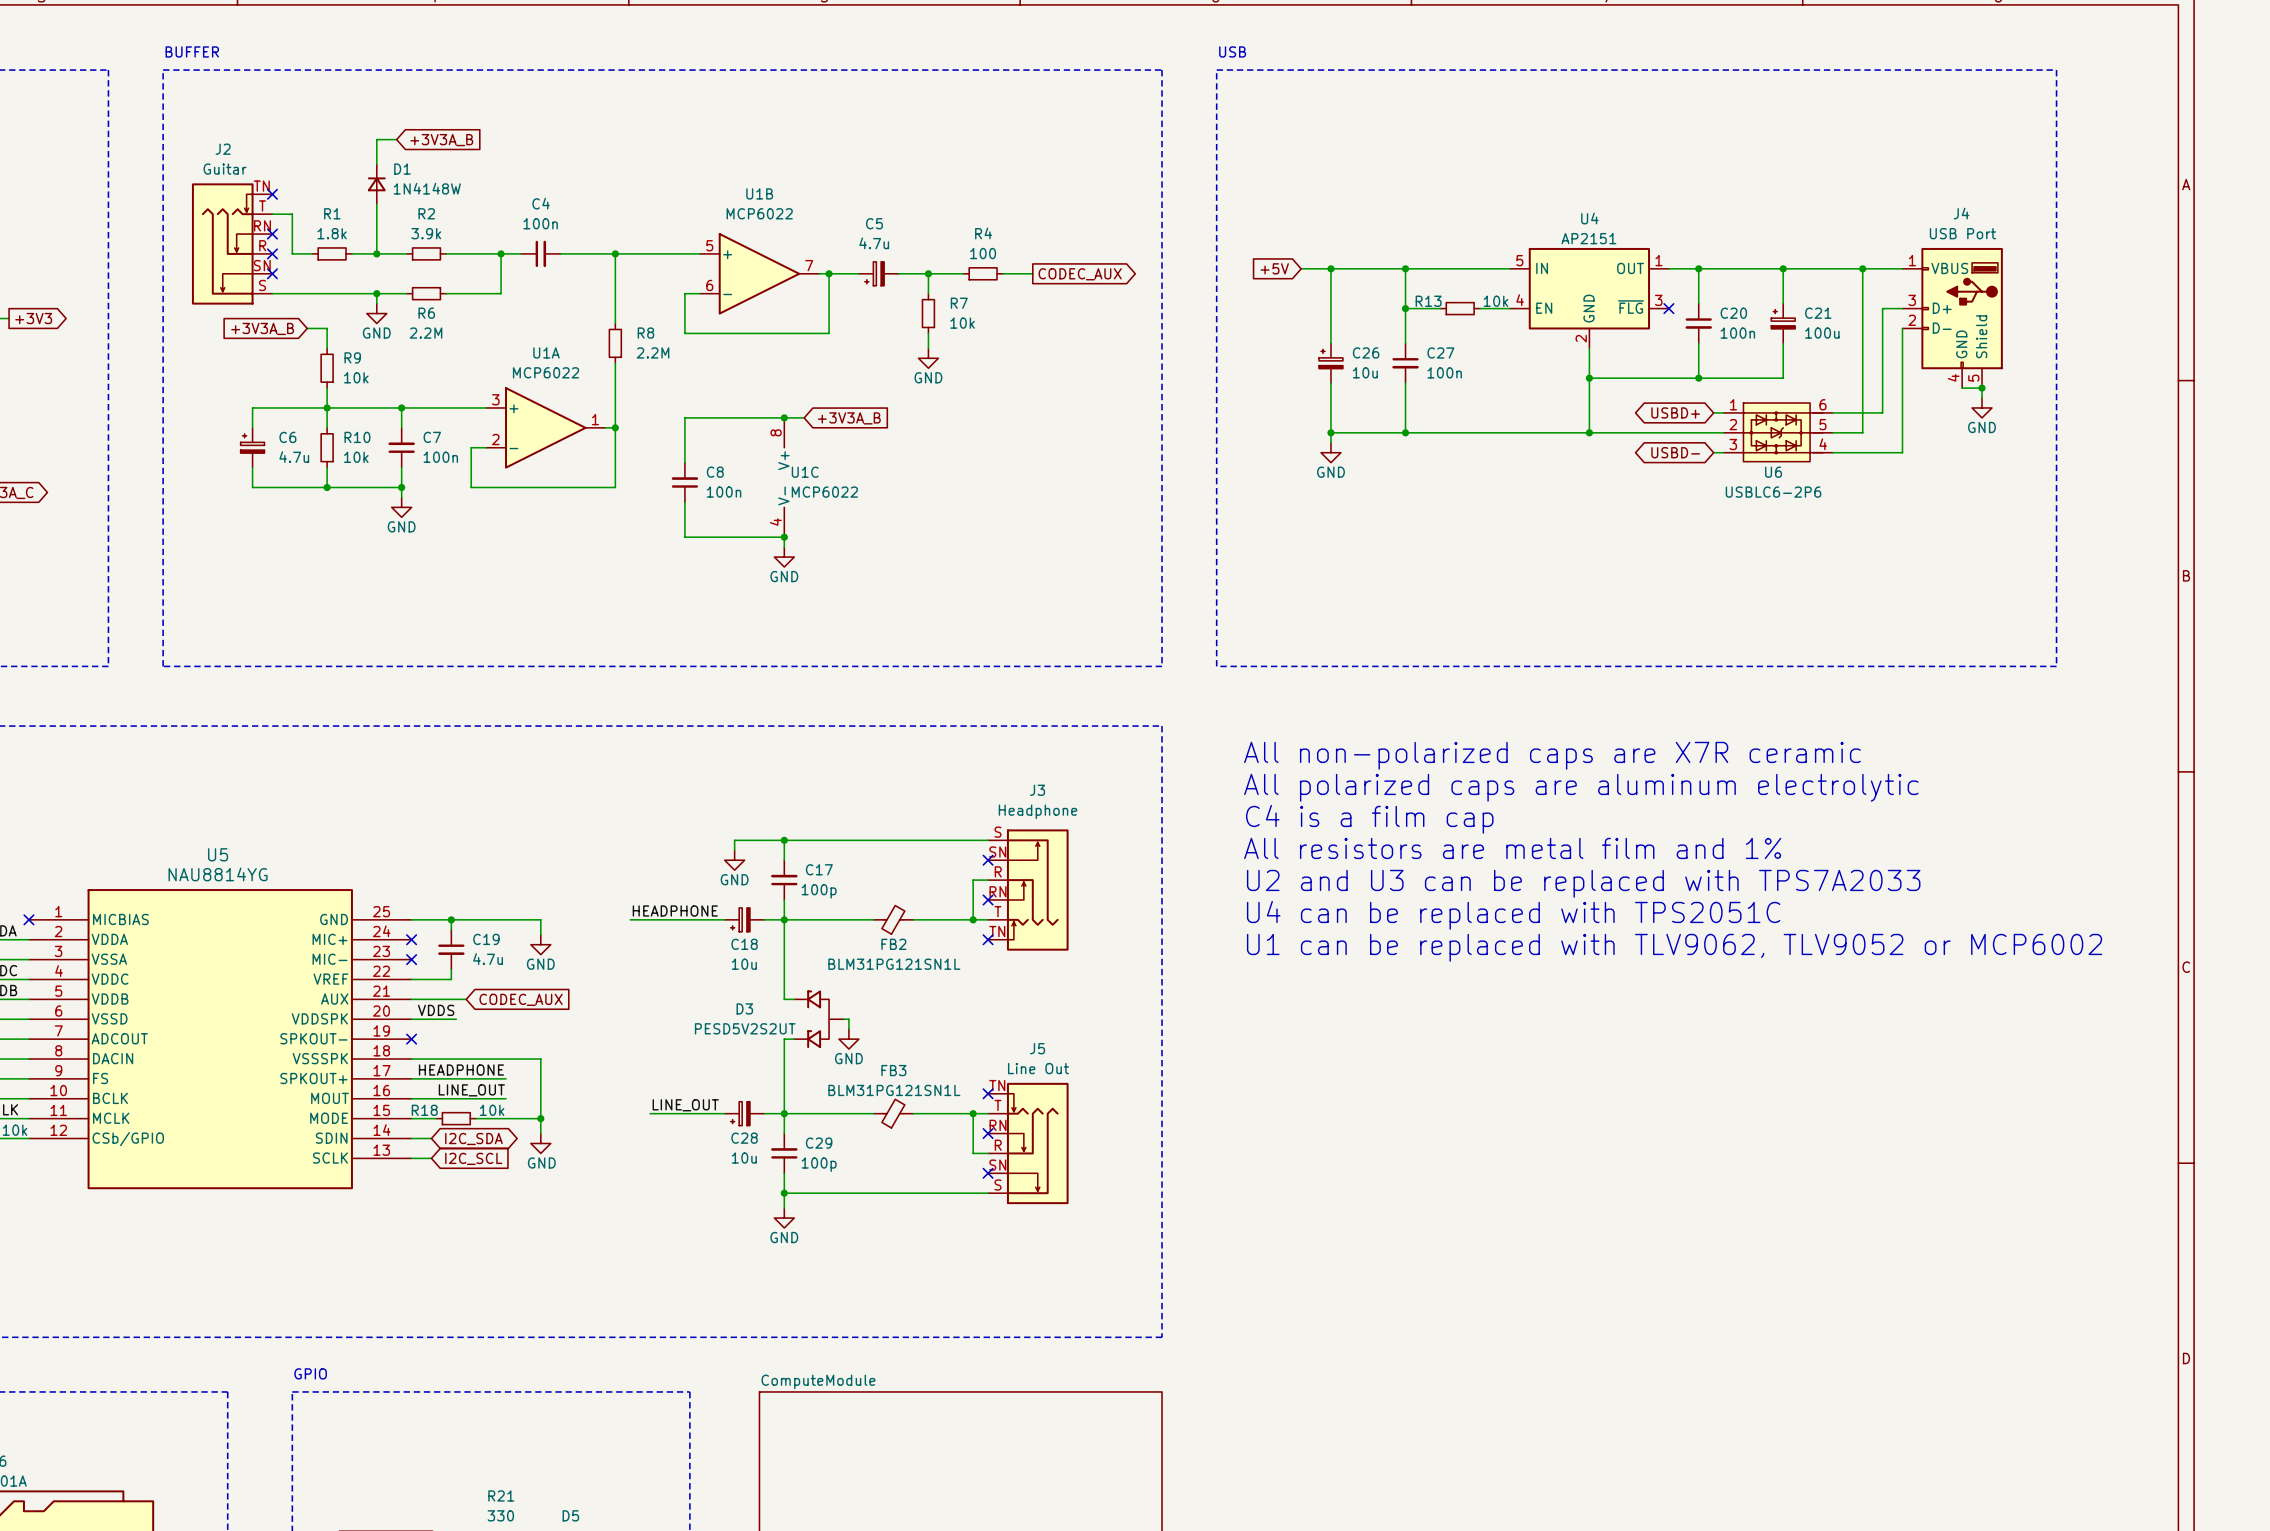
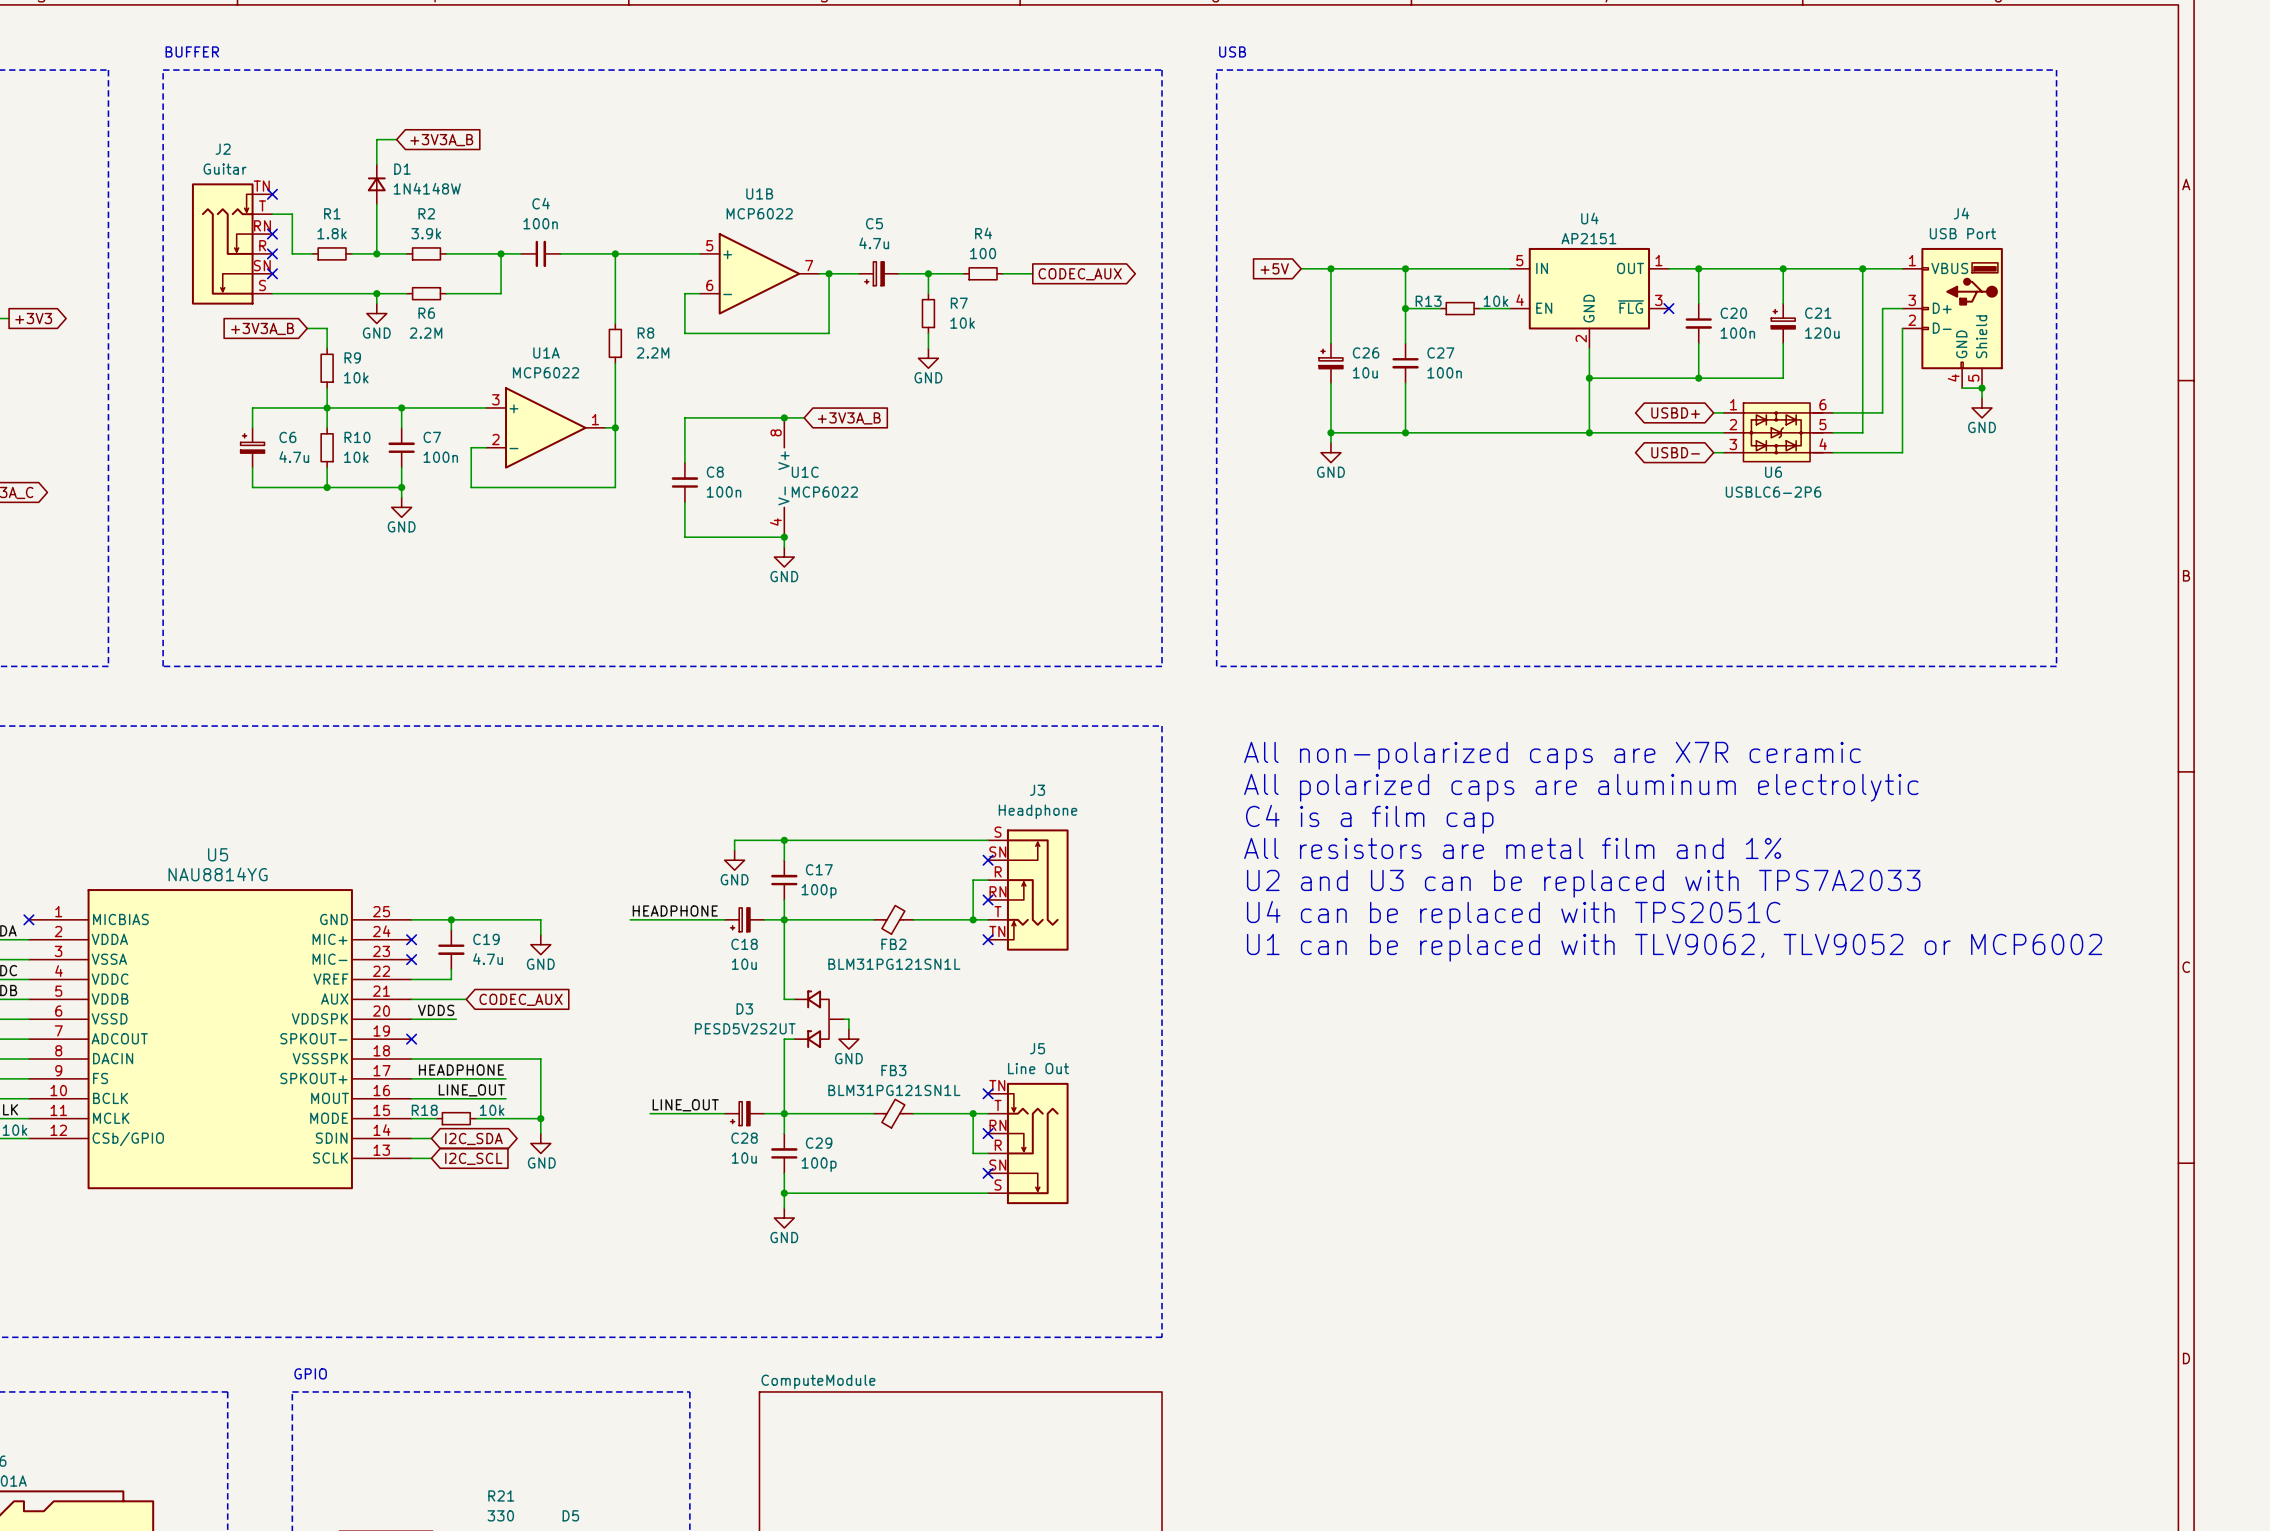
C21 value: 100u (1822, 333) -> 120u (1822, 333)

